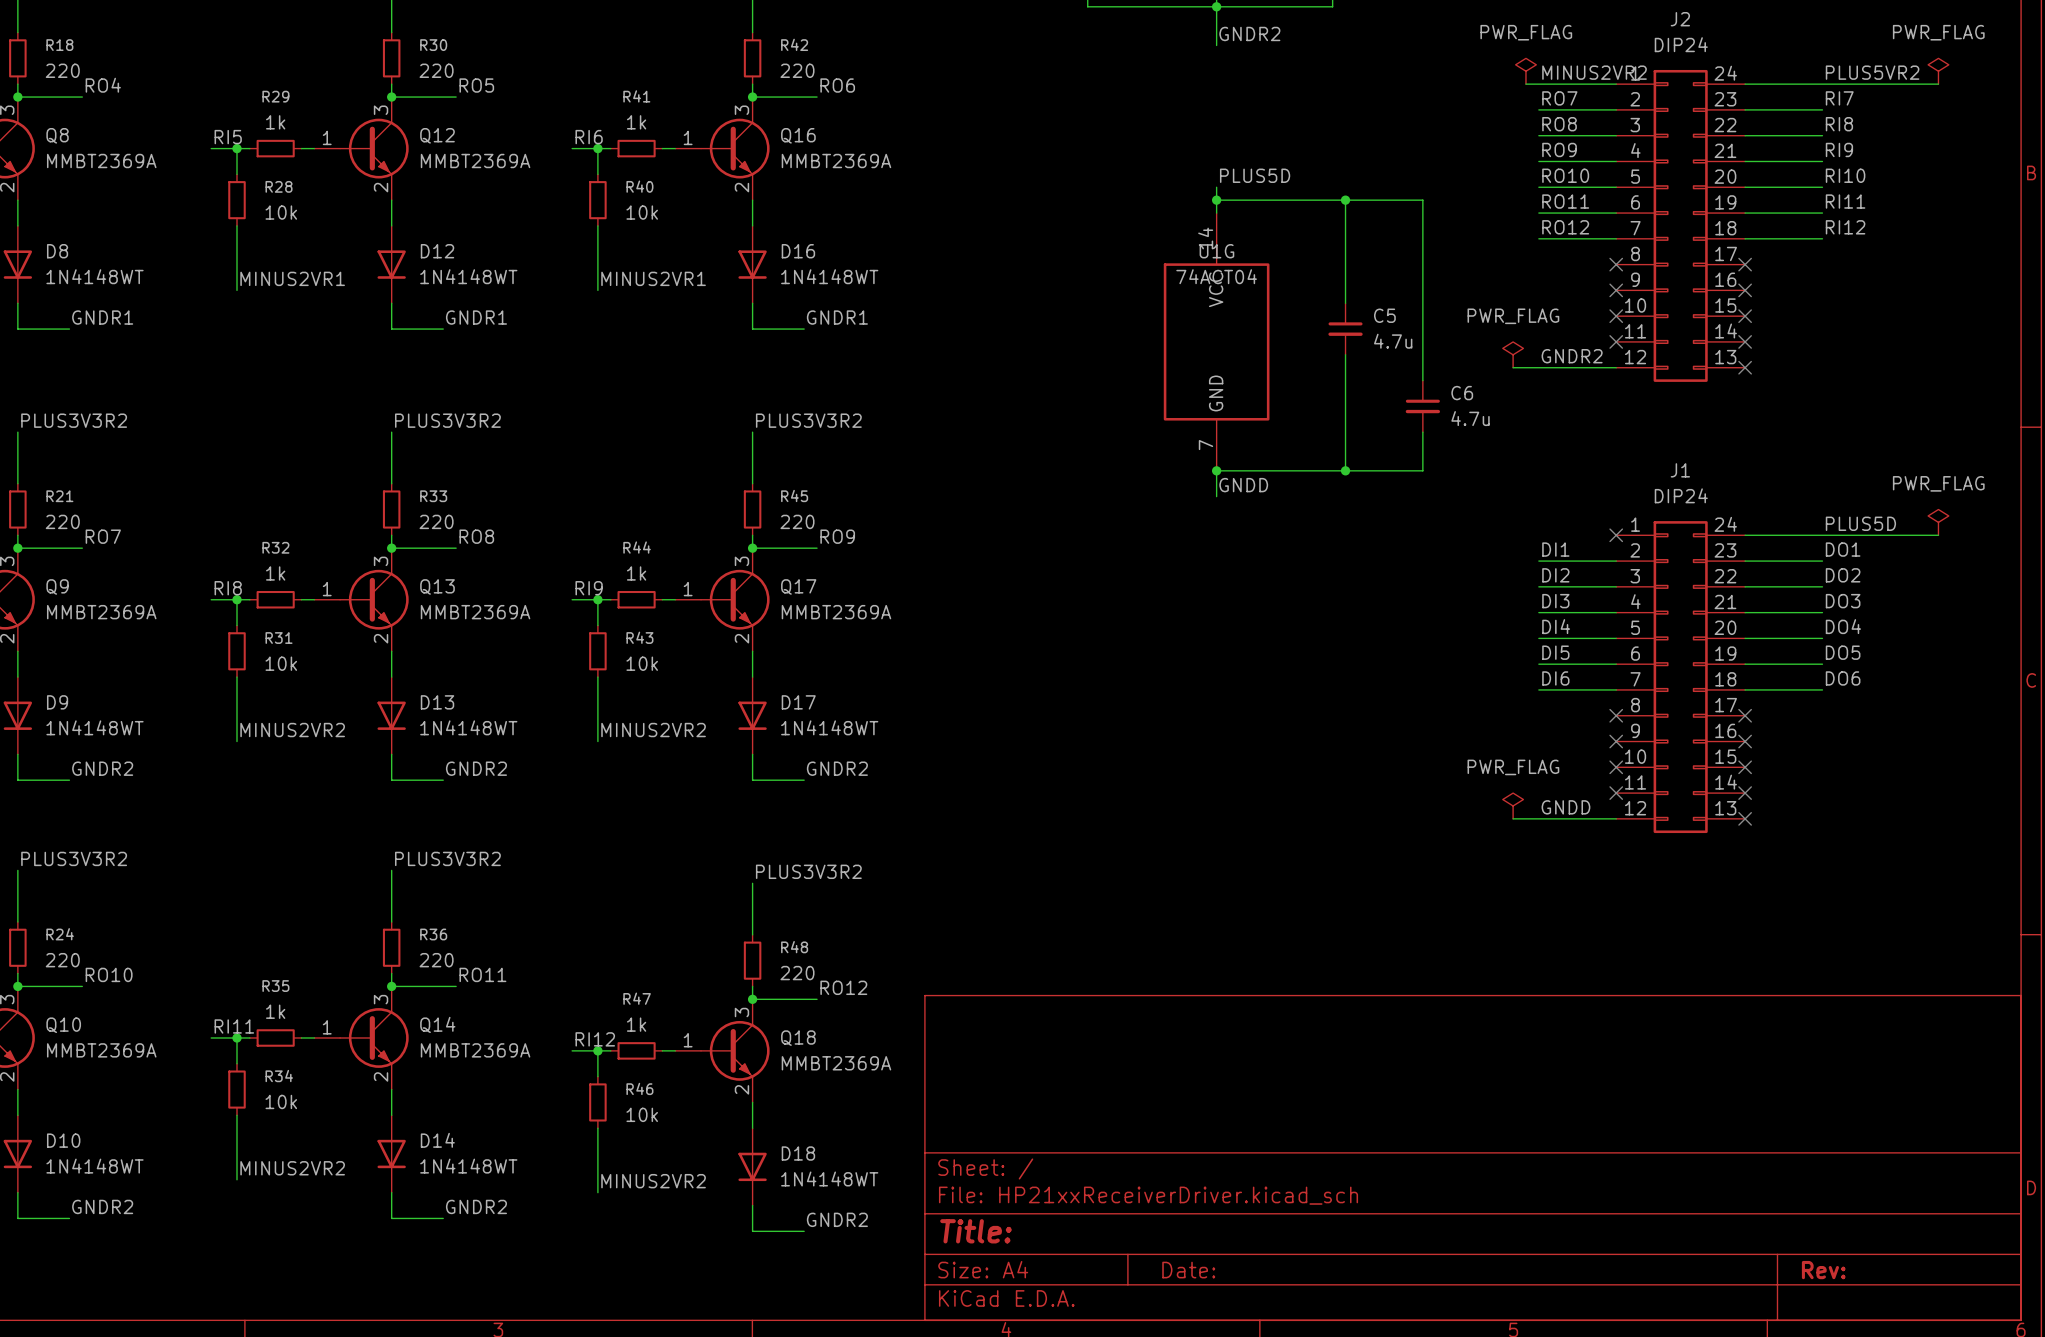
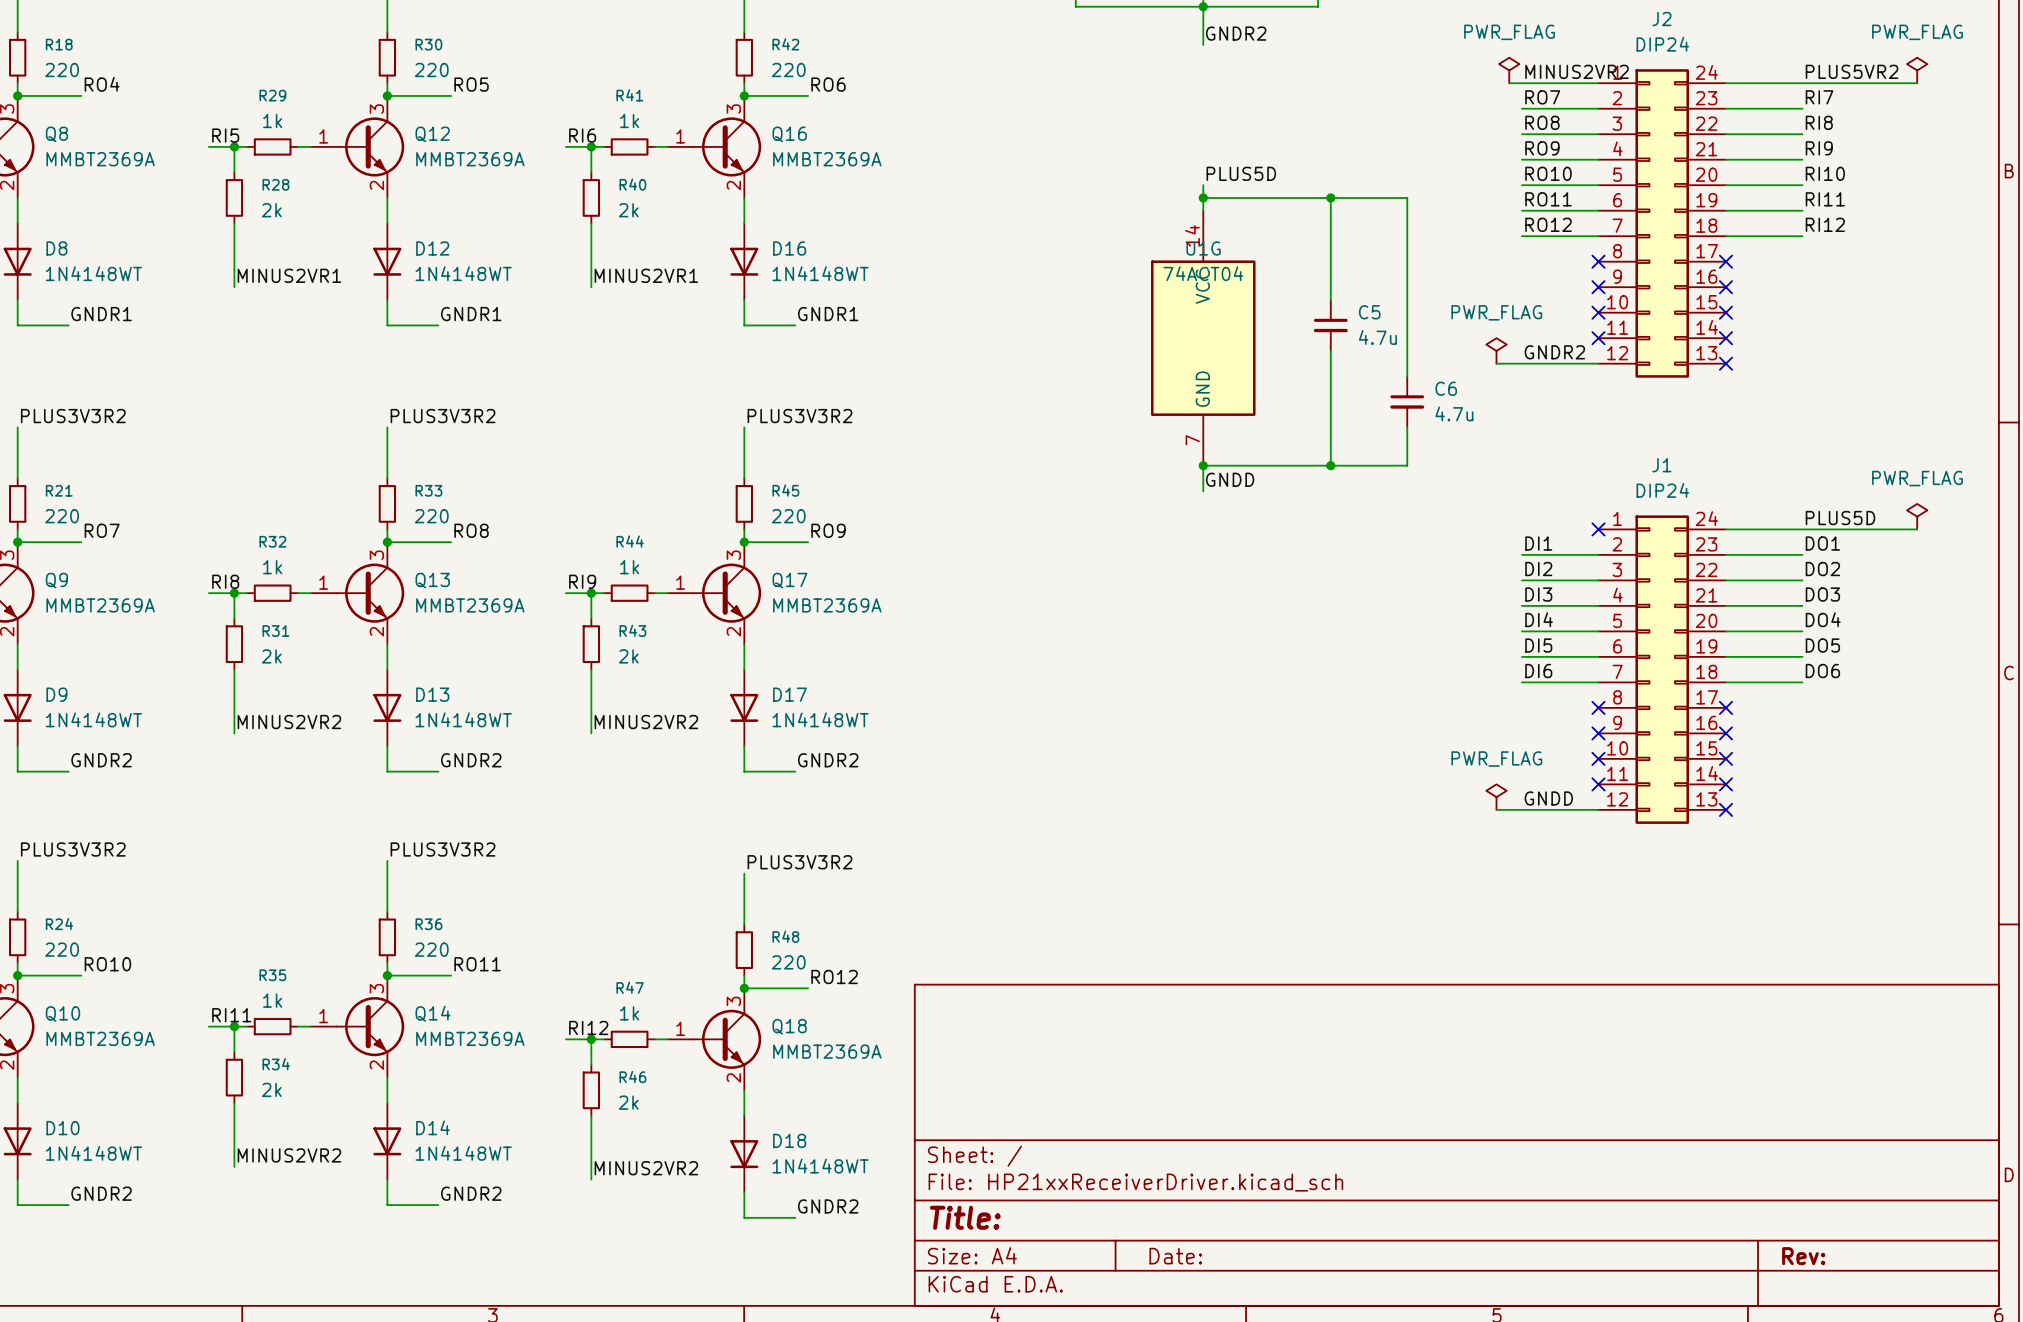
R28 value: 10k (281, 212) -> 2k (271, 210)
R40 value: 10k (642, 212) -> 2k (628, 210)
R31 value: 10k (281, 663) -> 2k (271, 656)
R43 value: 10k (642, 663) -> 2k (628, 656)
R34 value: 10k (281, 1101) -> 2k (271, 1089)
R46 value: 10k (642, 1114) -> 2k (628, 1102)

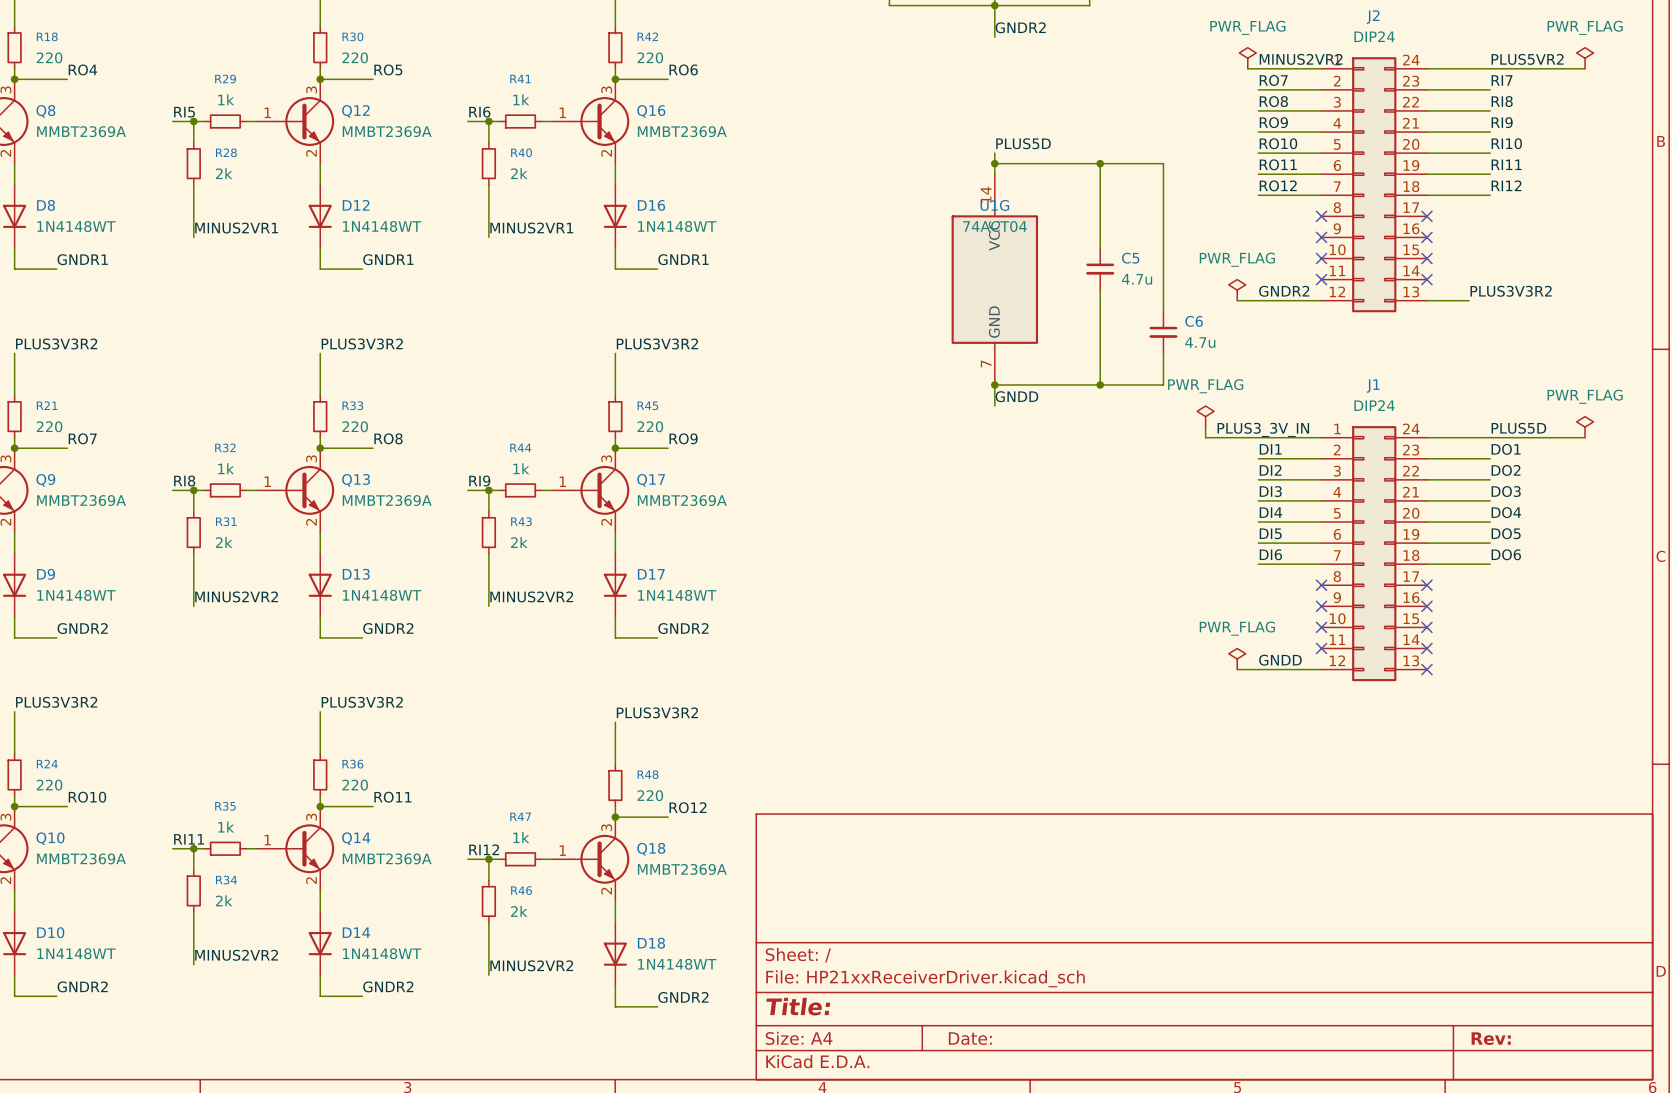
label: none -> PLUS3V3R2 (1511, 291)
wire: none -> (1426, 300) (1469, 300)
no-connect mark: (1725, 363) -> none
power symbol: none -> PWR_FLAG (1205, 416)
wire: none -> (1205, 427) (1205, 437) (1321, 437)
label: none -> PLUS3_3V_IN (1263, 429)
no-connect mark: (1598, 529) -> none

